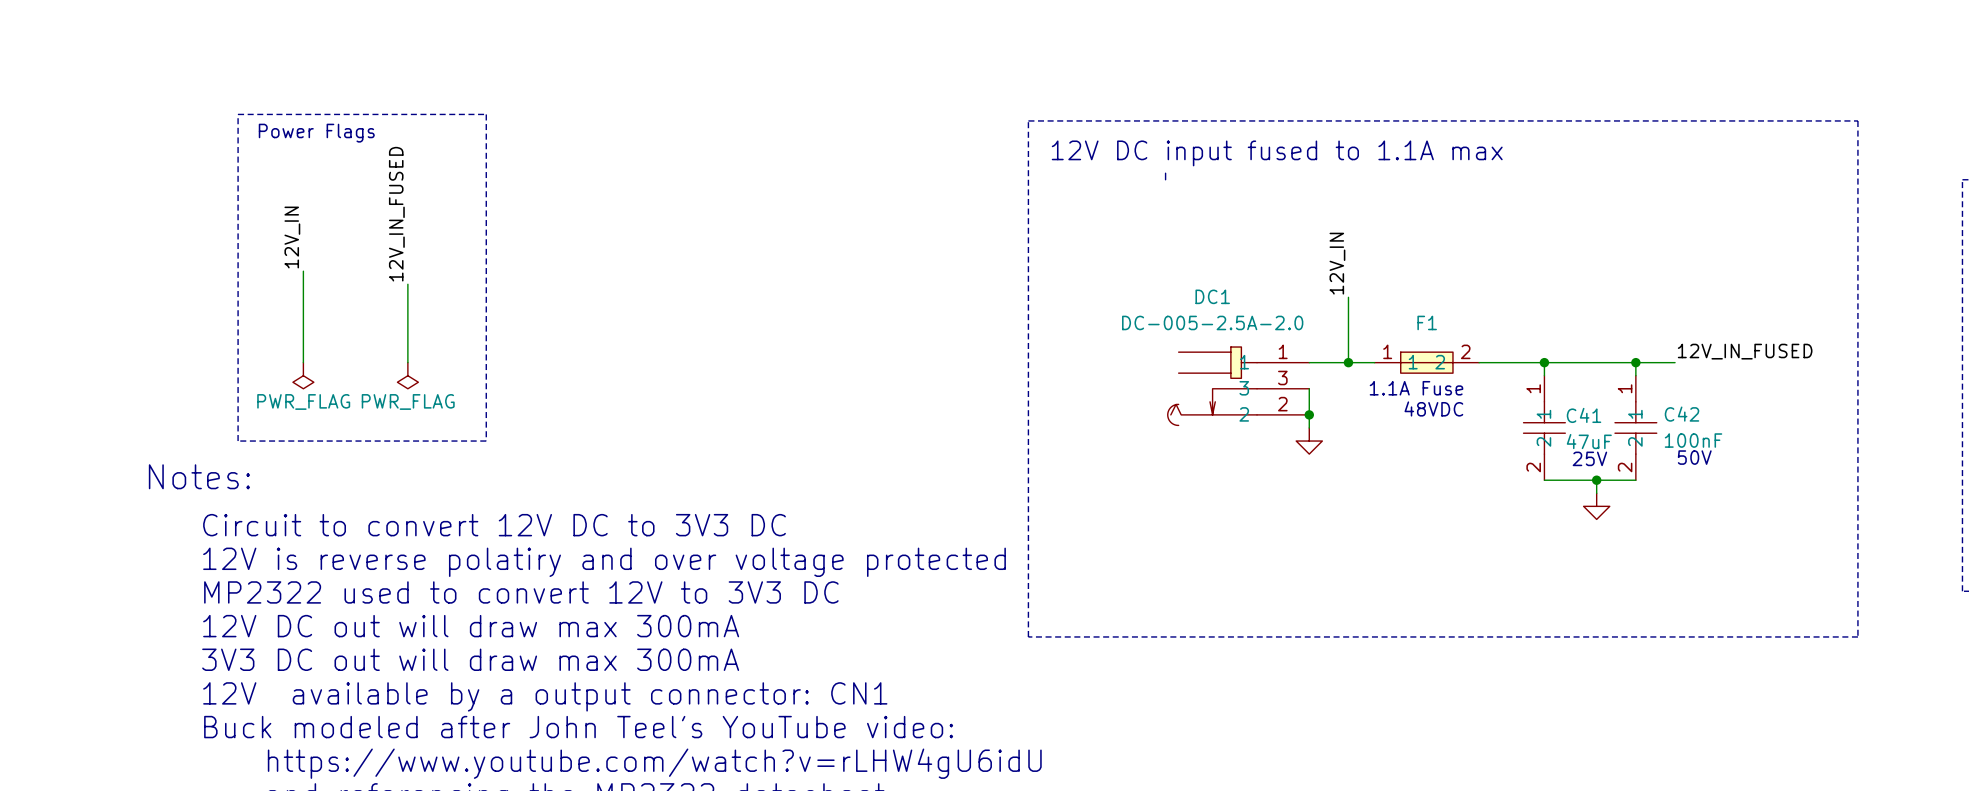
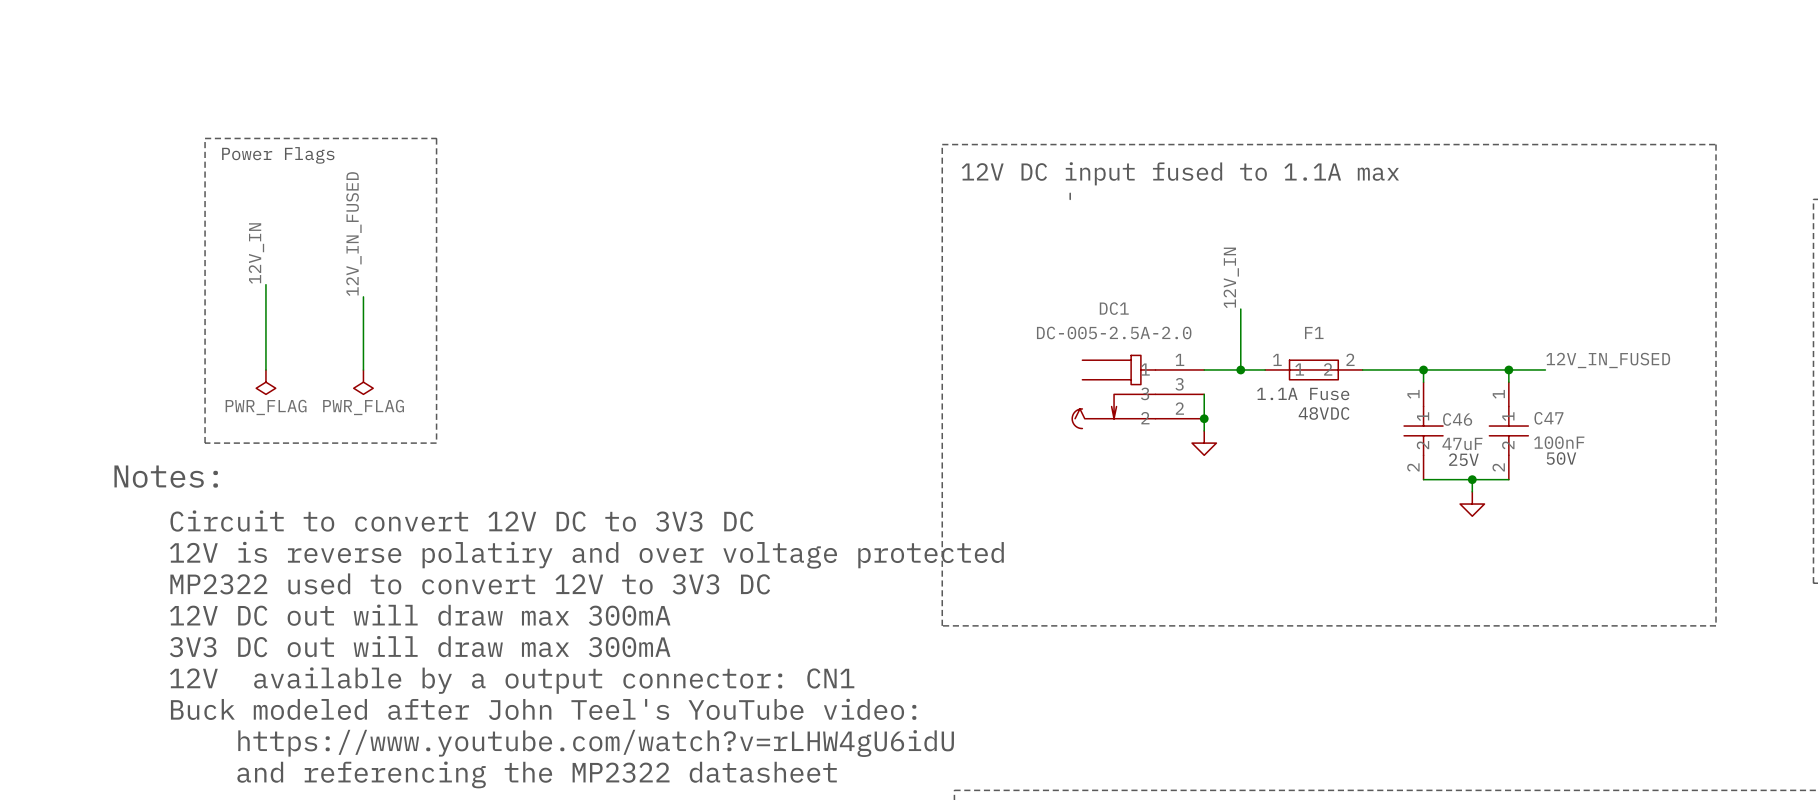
C42 name: C42 (1682, 414) -> C47 (1548, 418)
C41 name: C41 (1584, 415) -> C46 (1457, 419)

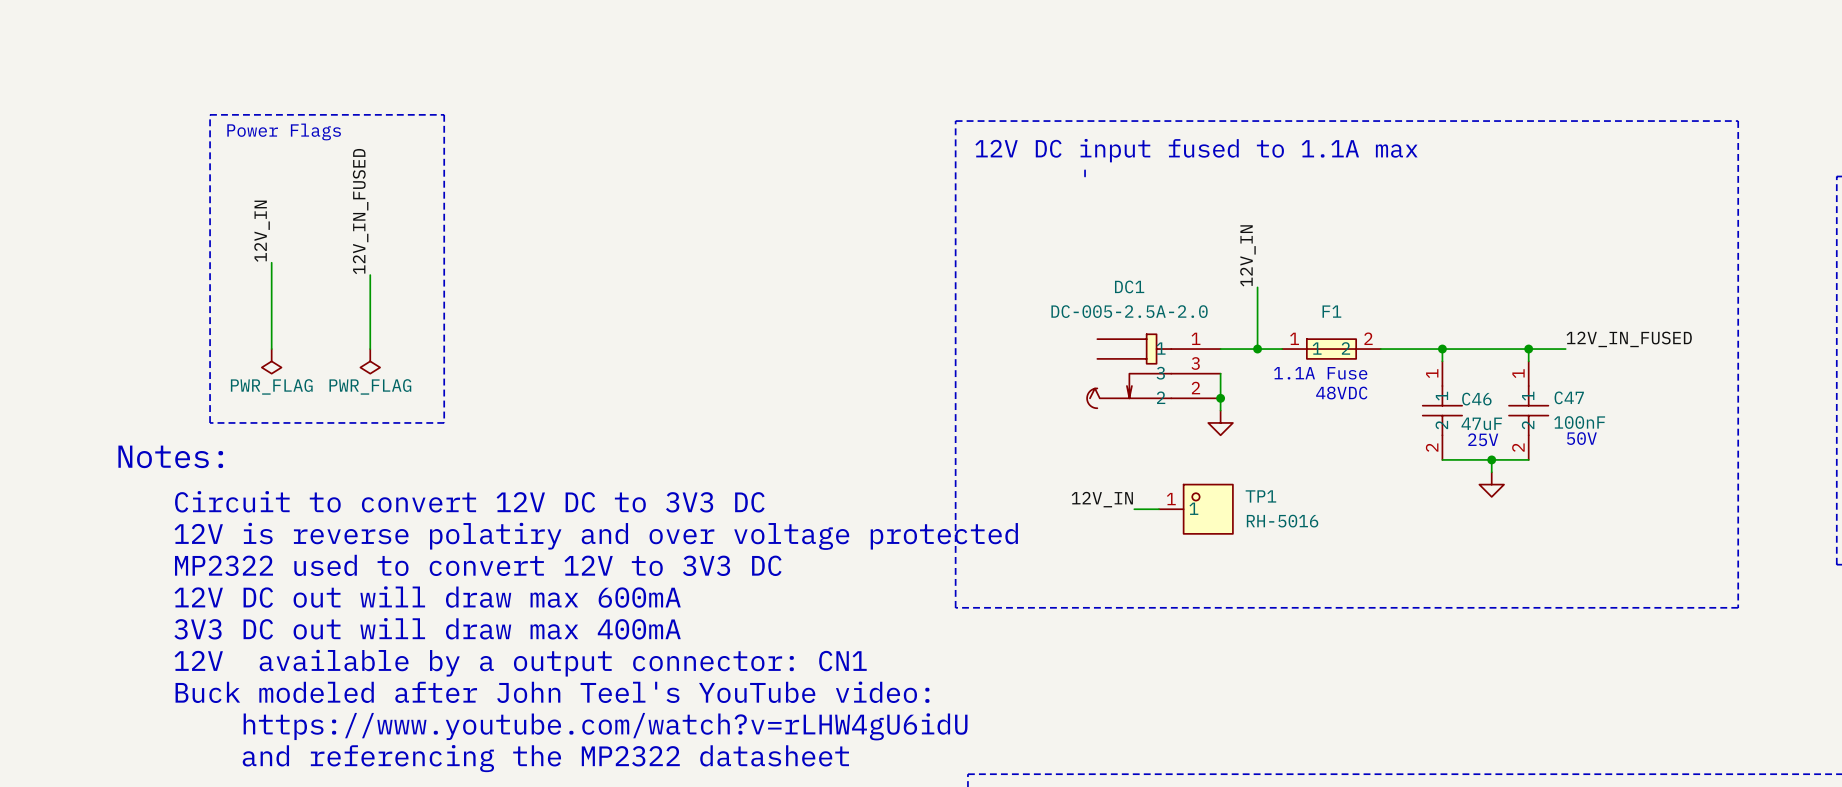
label: none -> 12V_IN (1102, 499)
wire: none -> (1134, 509) (1158, 509)
TP1: none -> RH-5016 (1195, 509)
text: 12V DC out will draw max 300mA (420, 615) -> 12V DC out will draw max 600mA (427, 597)
text: 3V3 DC out will draw max 300mA (420, 646) -> 3V3 DC out will draw max 400mA (427, 628)

